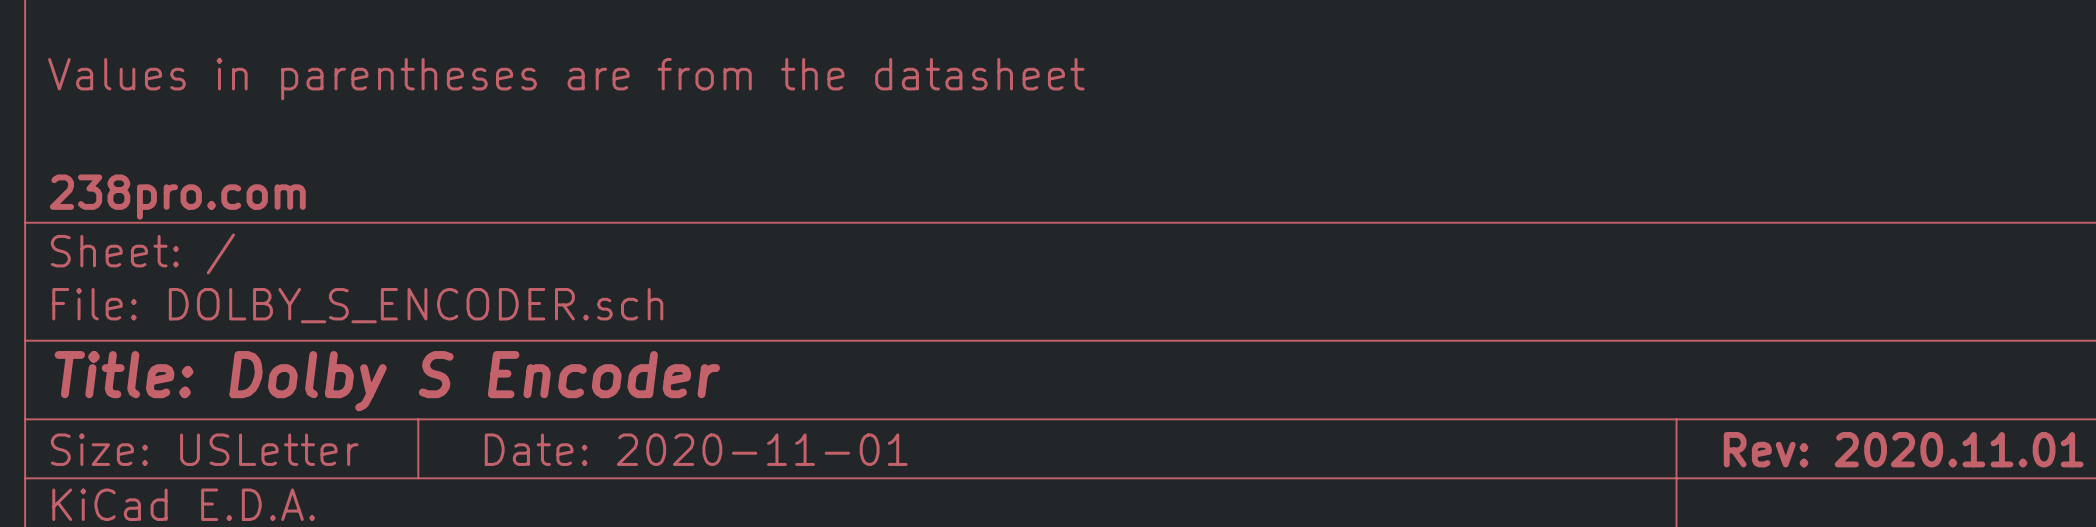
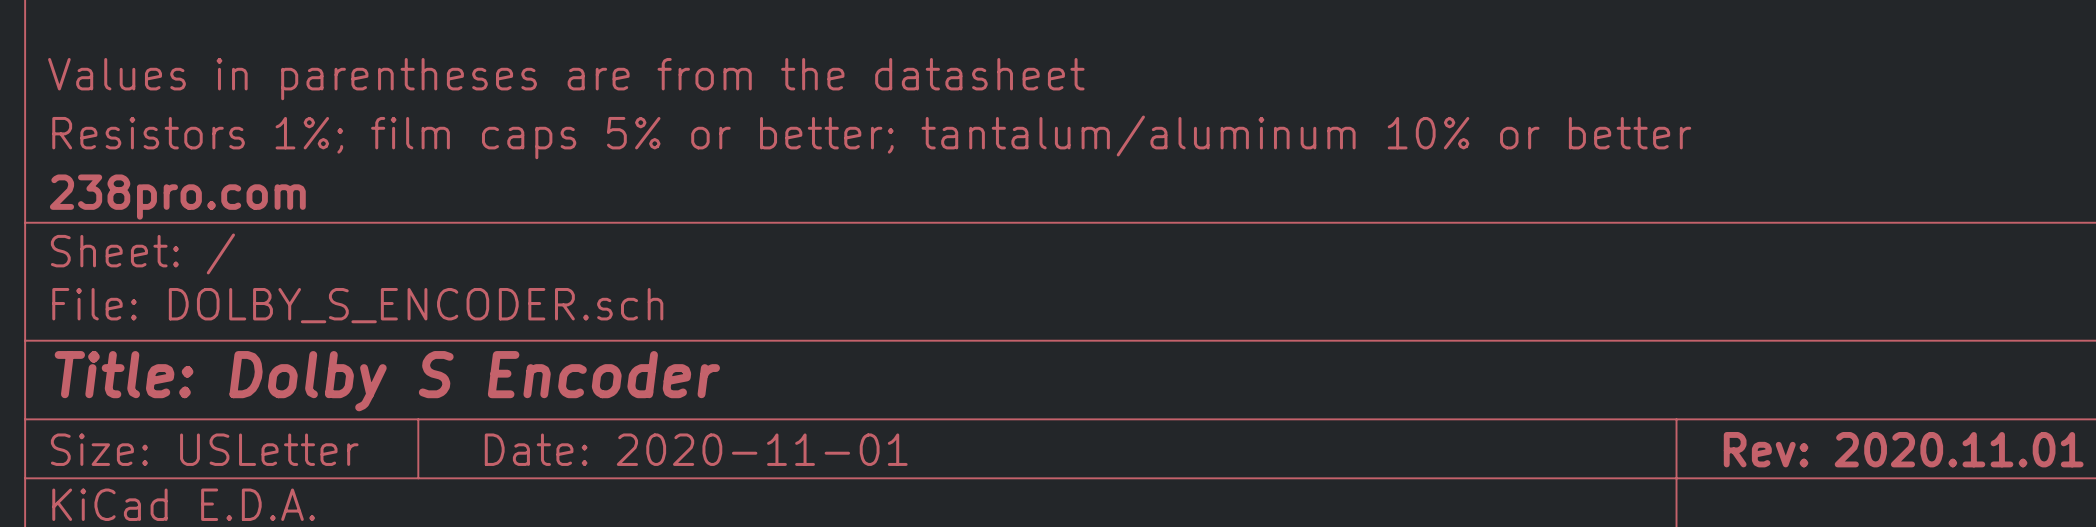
title block: none -> Resistors 1%; film caps 5% or better; tantalum/aluminum 10% or better (871, 137)

